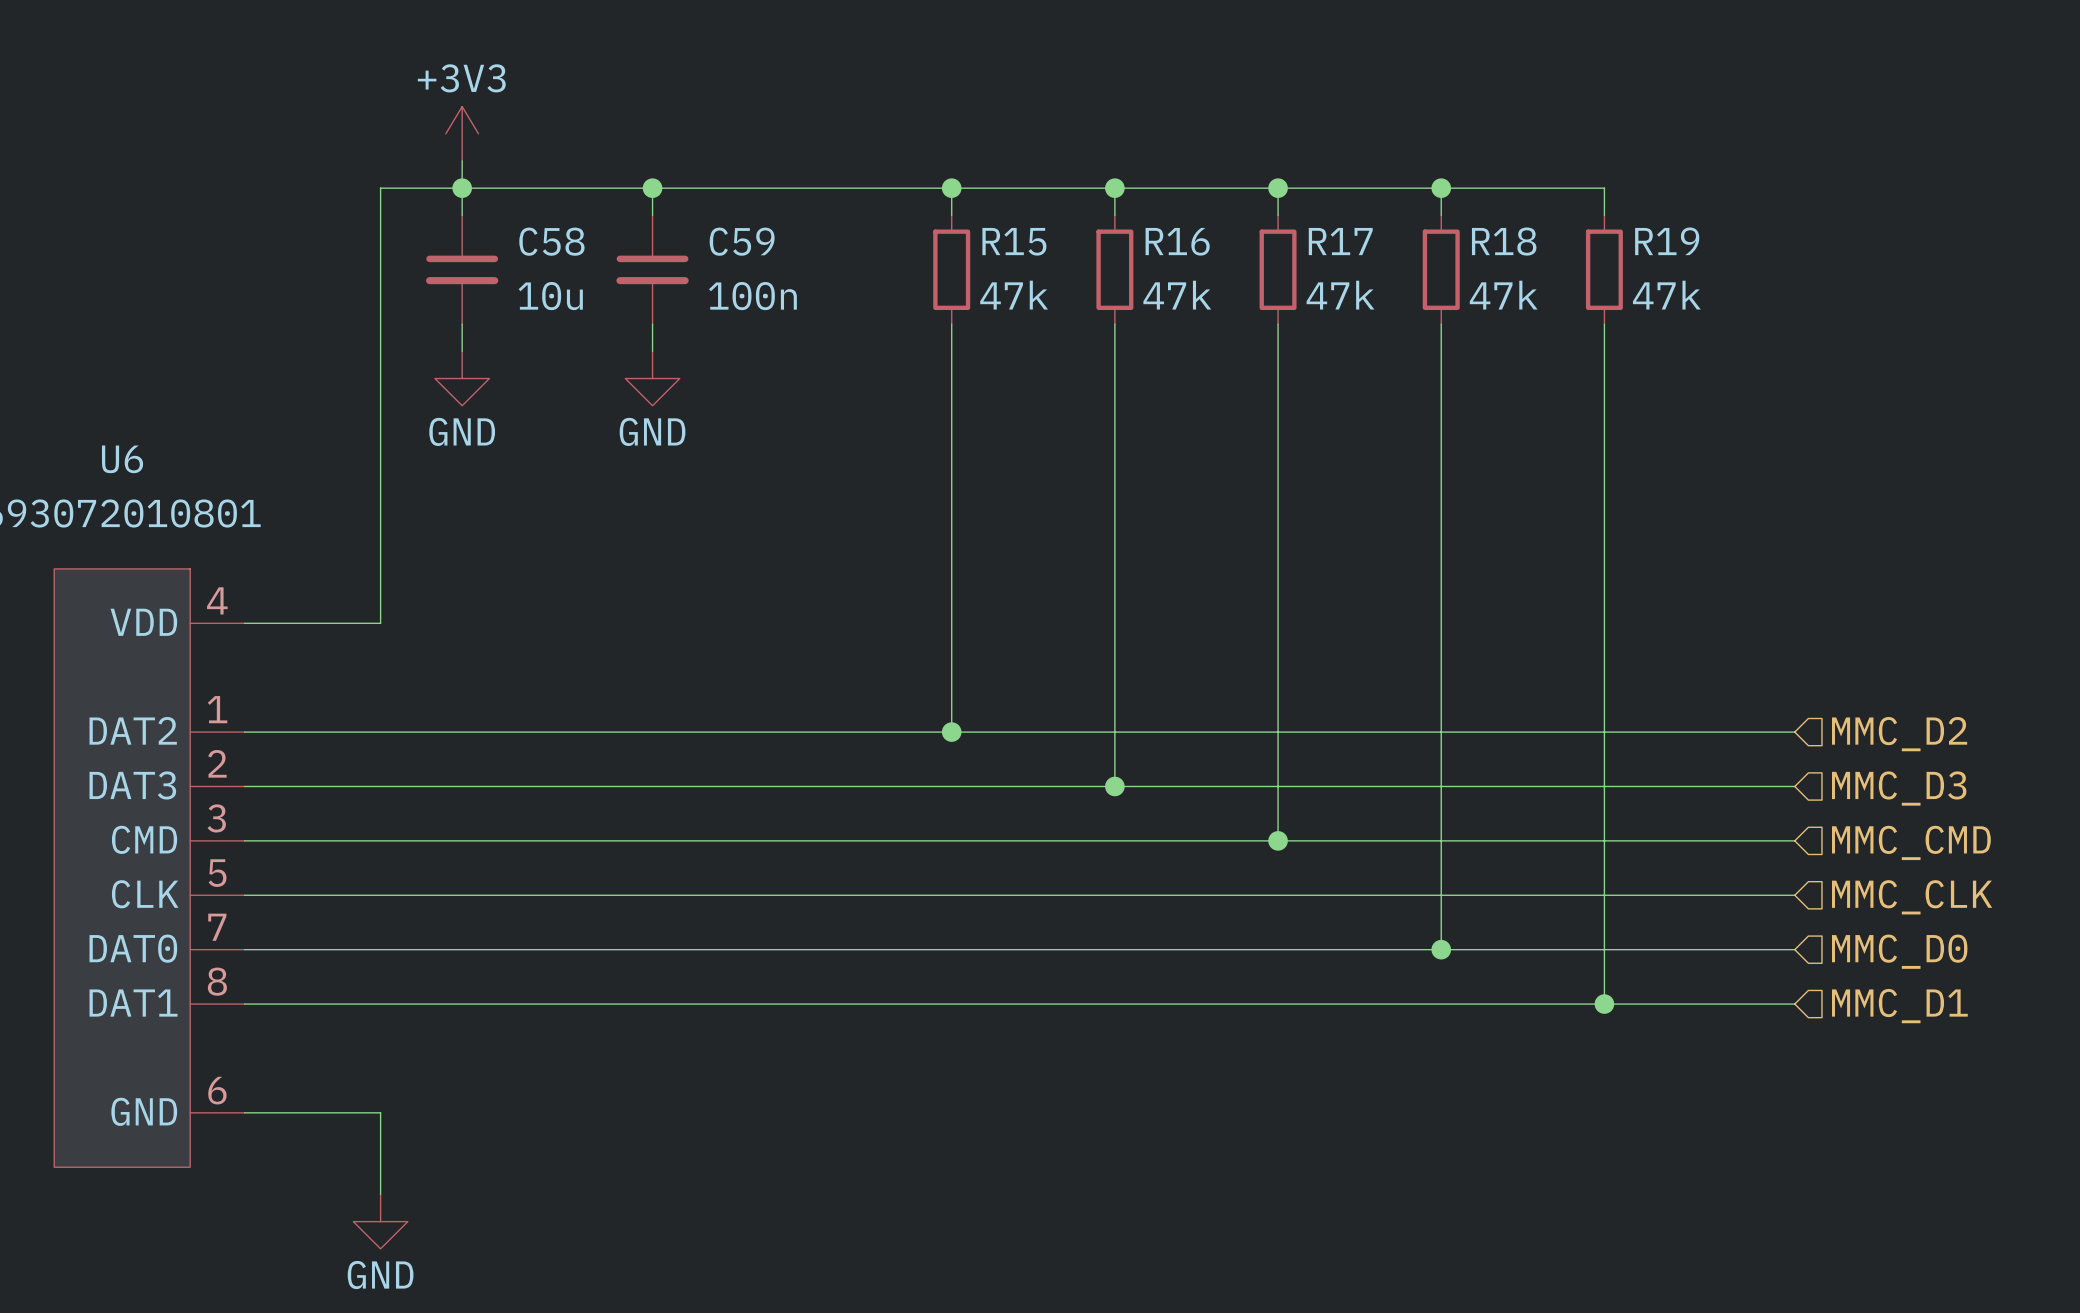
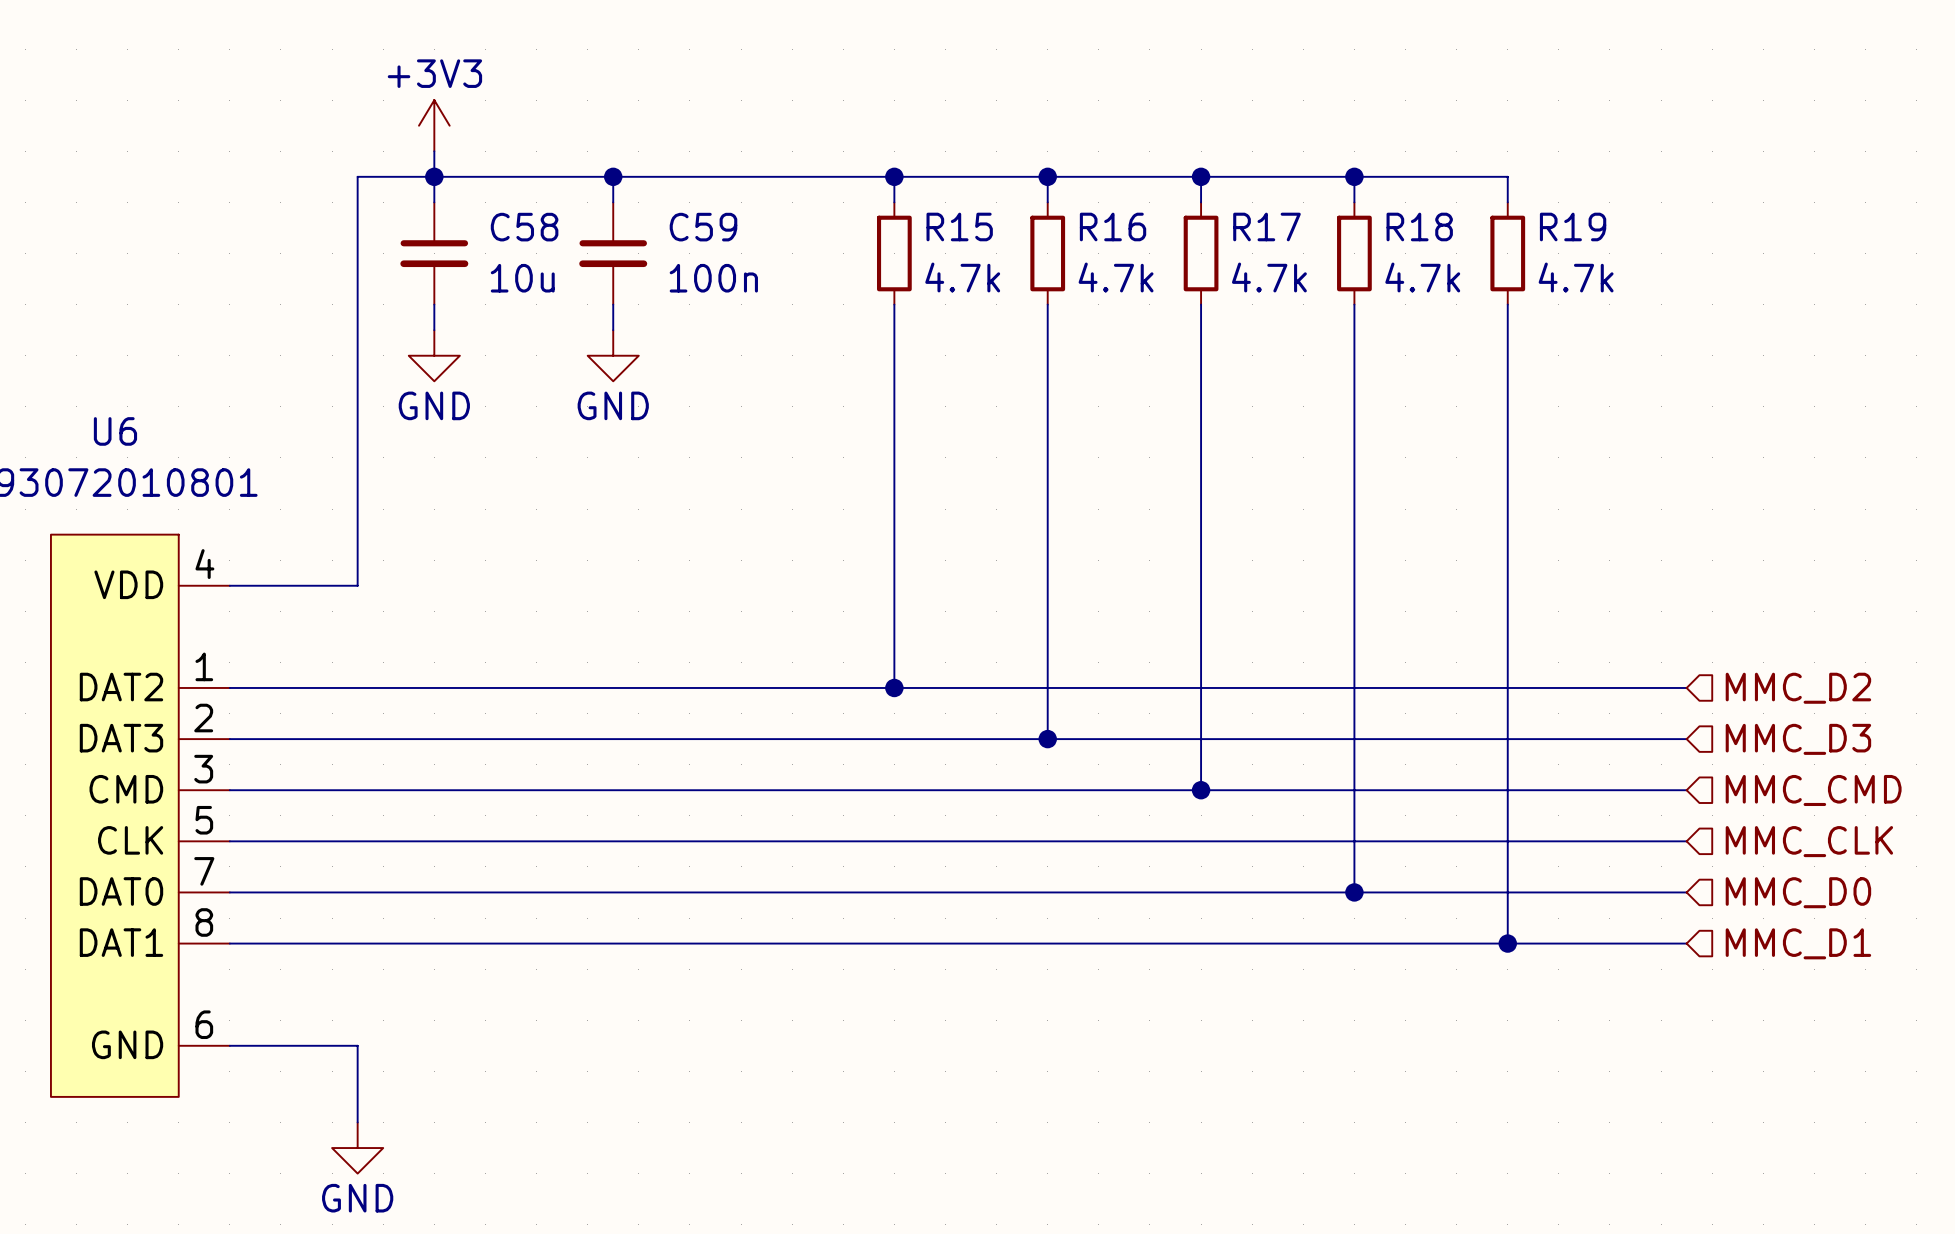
R15 value: 47k (1014, 295) -> 4.7k (962, 277)
R16 value: 47k (1177, 295) -> 4.7k (1116, 277)
R17 value: 47k (1340, 295) -> 4.7k (1269, 277)
R18 value: 47k (1503, 295) -> 4.7k (1422, 277)
R19 value: 47k (1666, 295) -> 4.7k (1576, 277)

